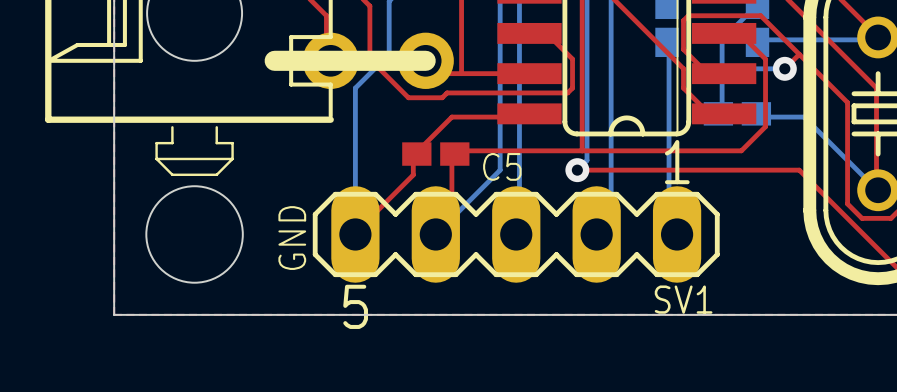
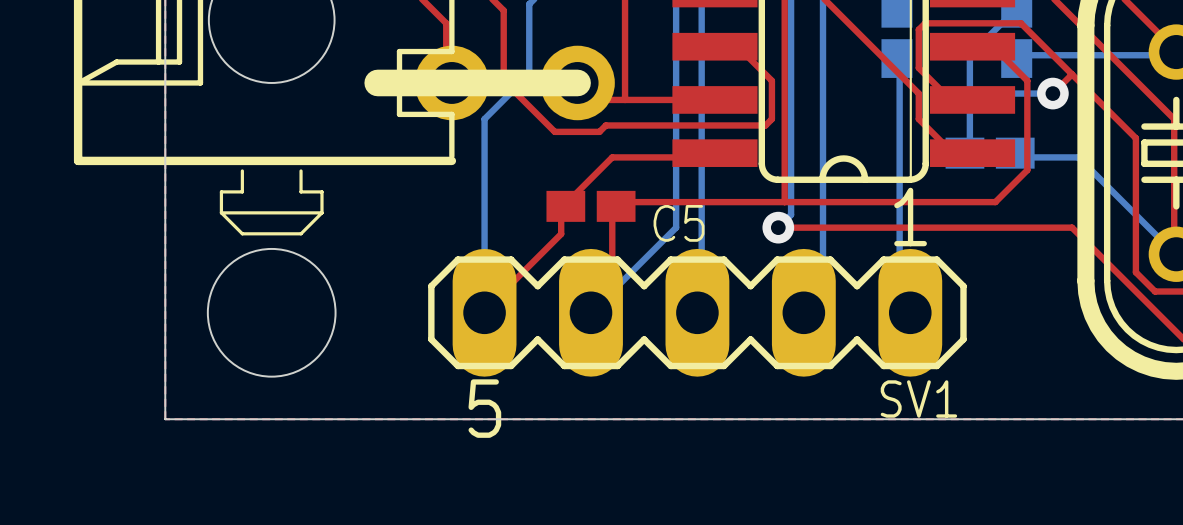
text: GND (292, 238) -> none

